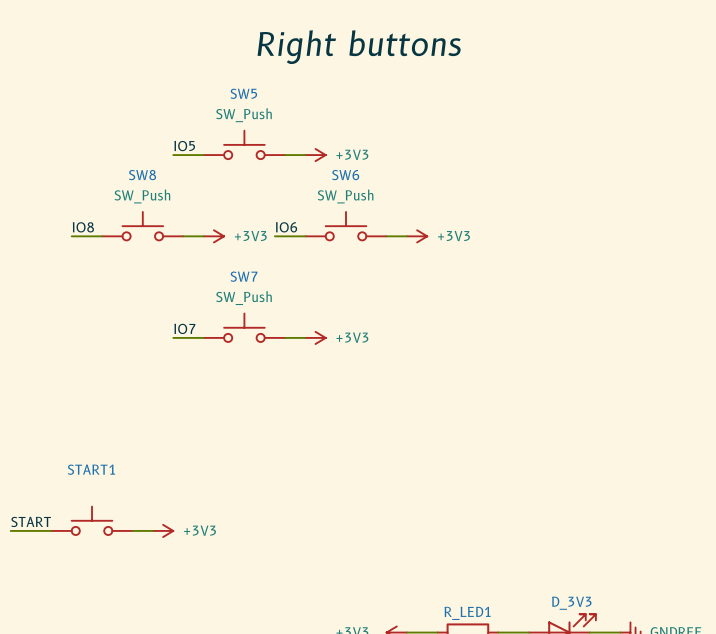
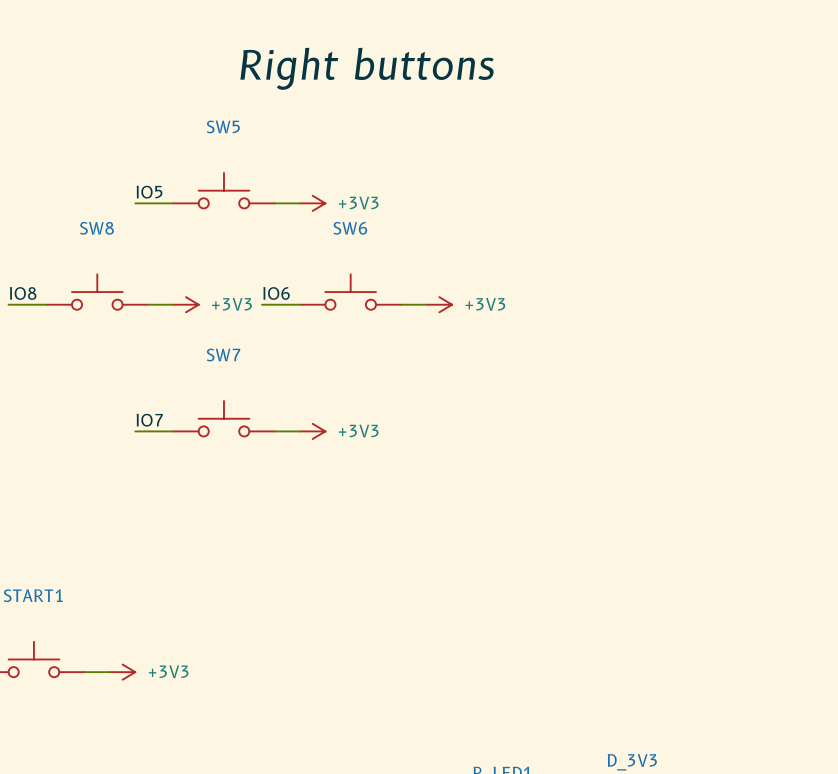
SW5 value: SW_Push (244, 115) -> none
SW8 value: SW_Push (142, 196) -> none
SW6 value: SW_Push (345, 196) -> none
SW7 value: SW_Push (244, 298) -> none

